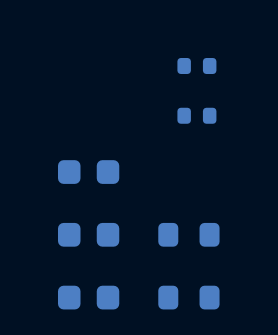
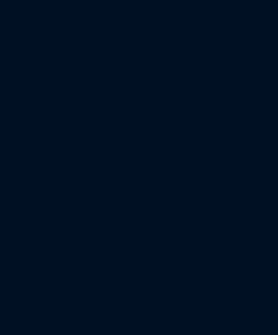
part: (196, 65) -> none
part: (196, 115) -> none
part: (88, 172) -> none
part: (88, 234) -> none
part: (188, 234) -> none
part: (88, 297) -> none
part: (188, 297) -> none

